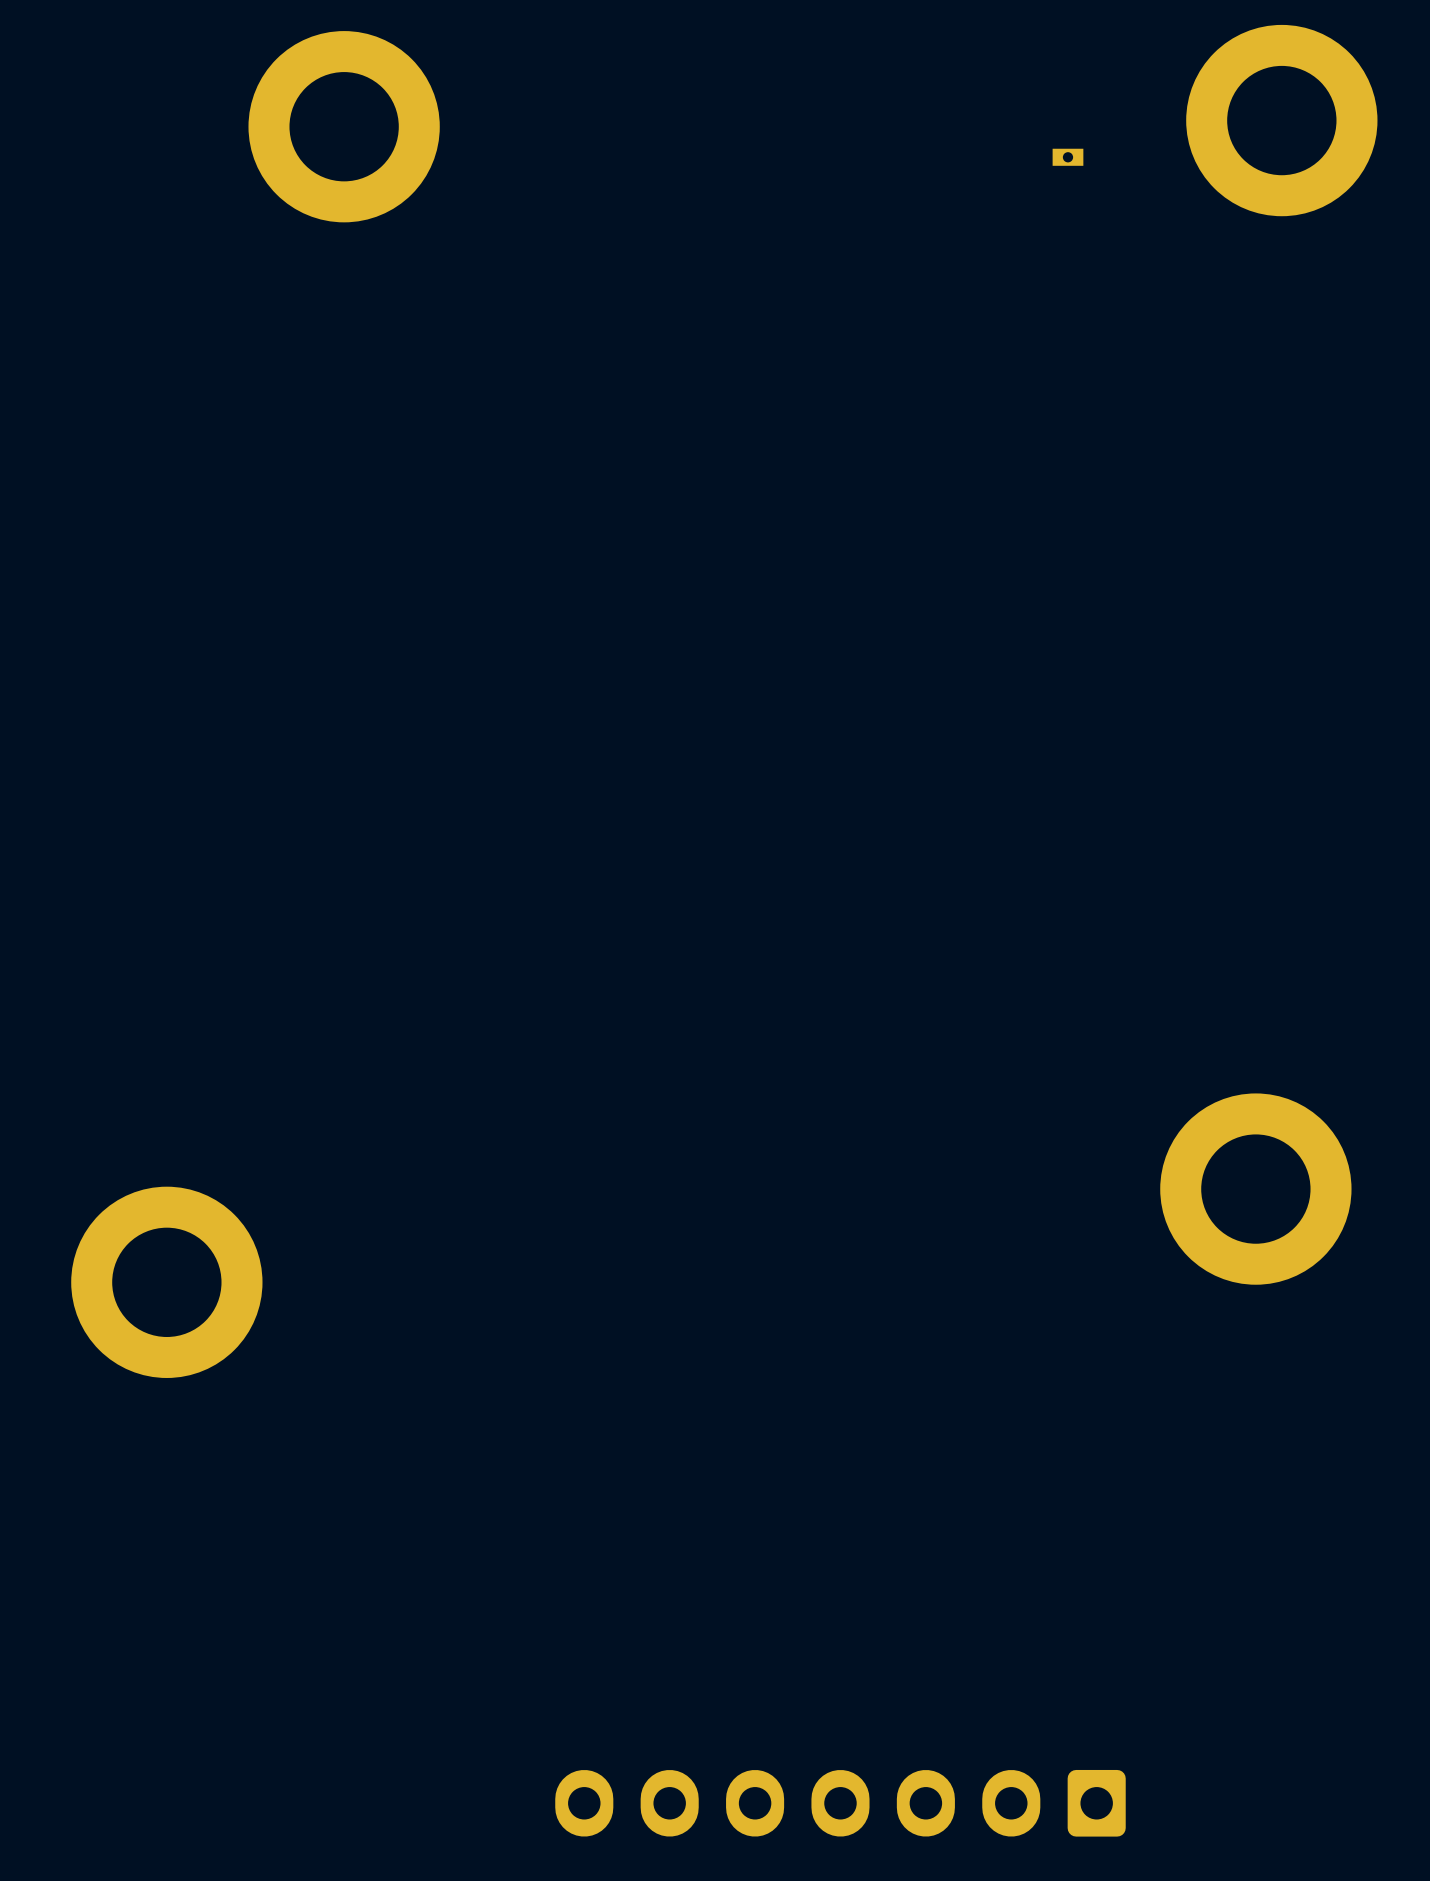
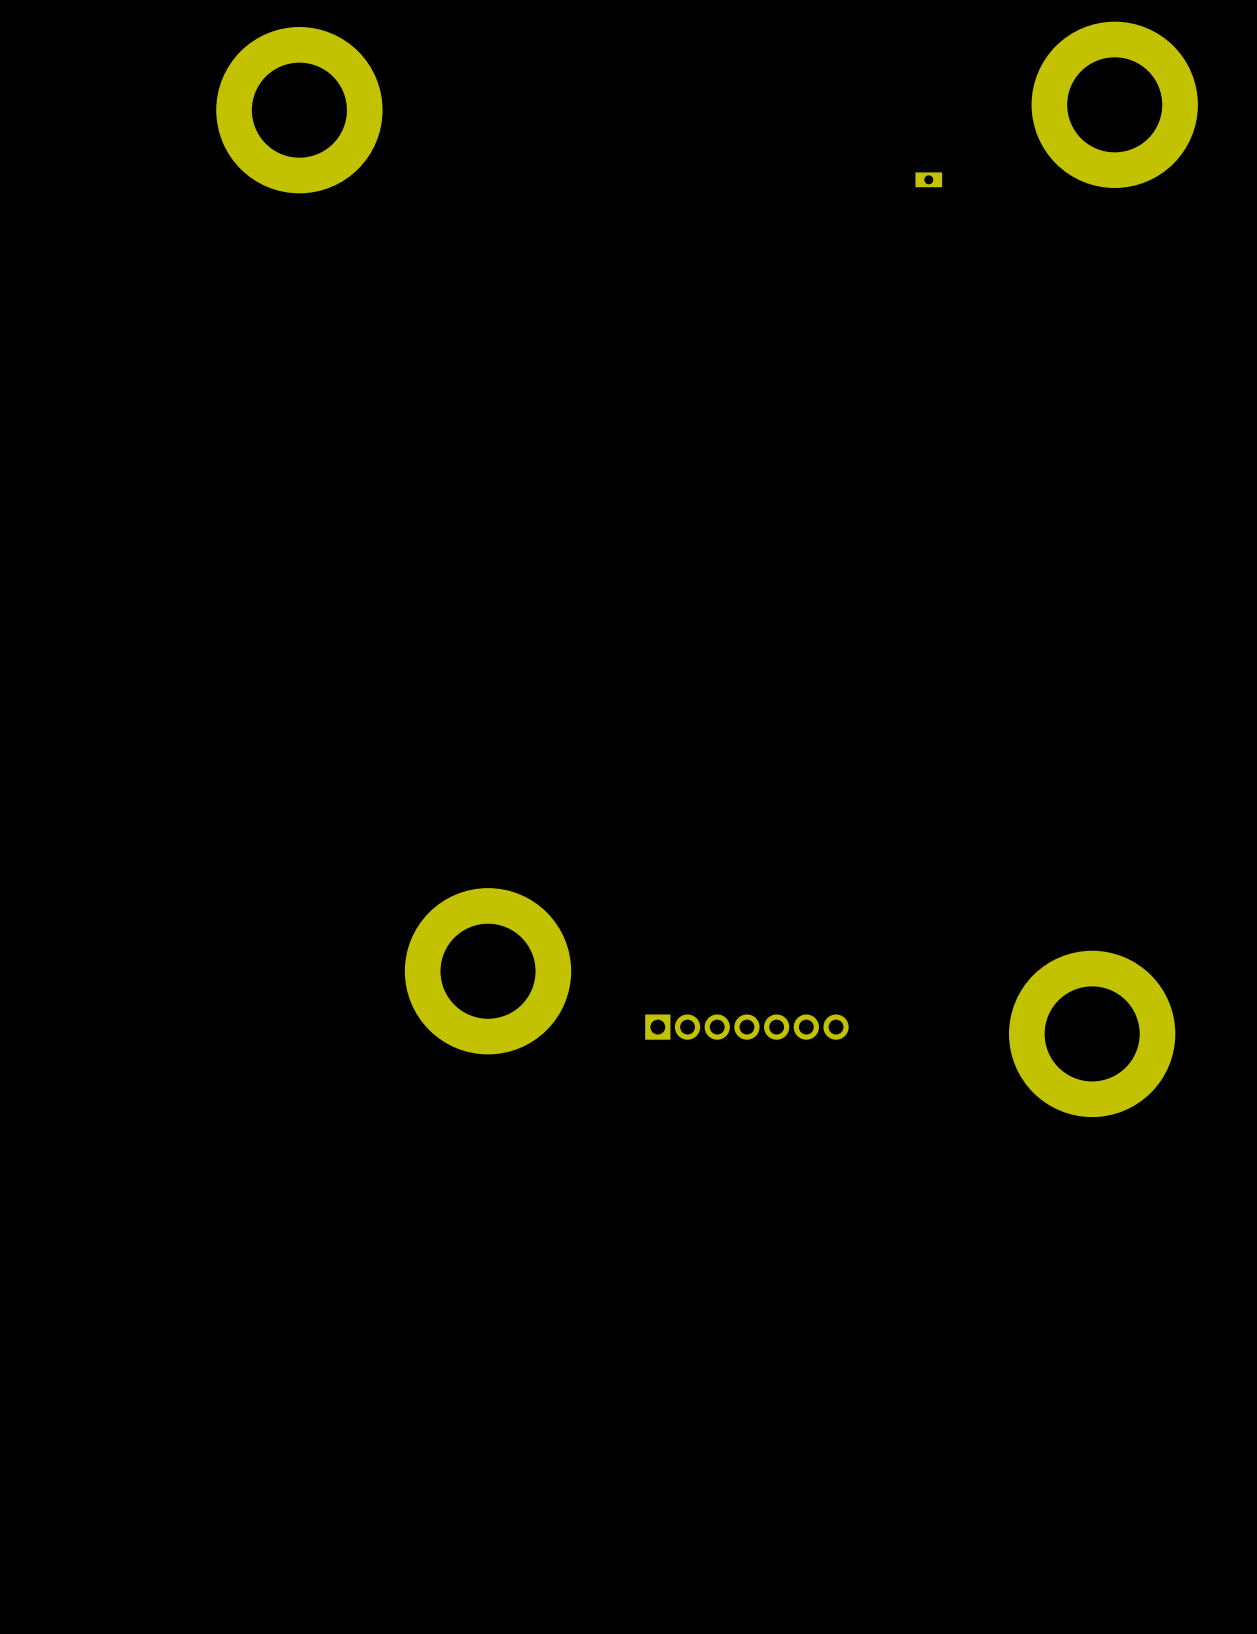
part position: (1067, 157) -> (928, 179)
part: none -> (746, 1027)
part position: (166, 1282) -> (488, 971)
part: (840, 1803) -> none

